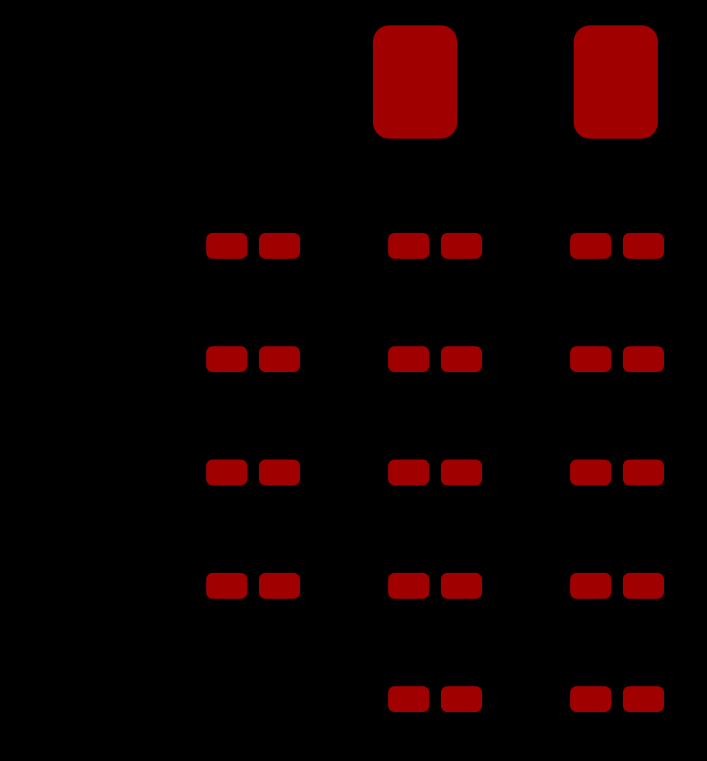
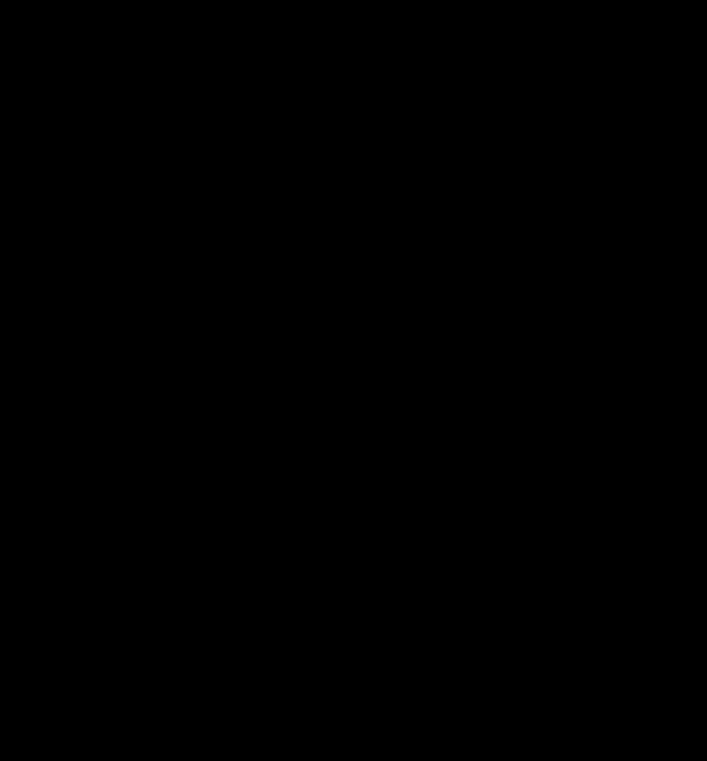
part: (515, 82) -> none
part: (253, 245) -> none
part: (435, 245) -> none
part: (617, 245) -> none
part: (253, 359) -> none
part: (435, 359) -> none
part: (617, 359) -> none
part: (253, 472) -> none
part: (435, 472) -> none
part: (617, 472) -> none
part: (253, 585) -> none
part: (435, 585) -> none
part: (617, 585) -> none
part: (435, 699) -> none
part: (617, 699) -> none

